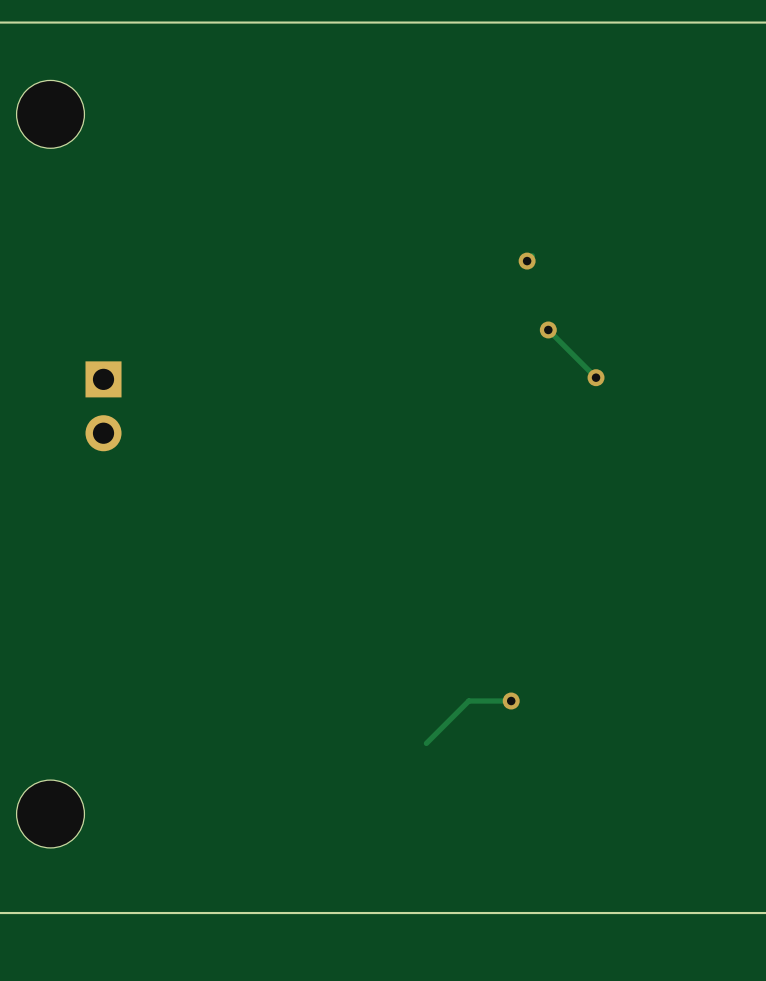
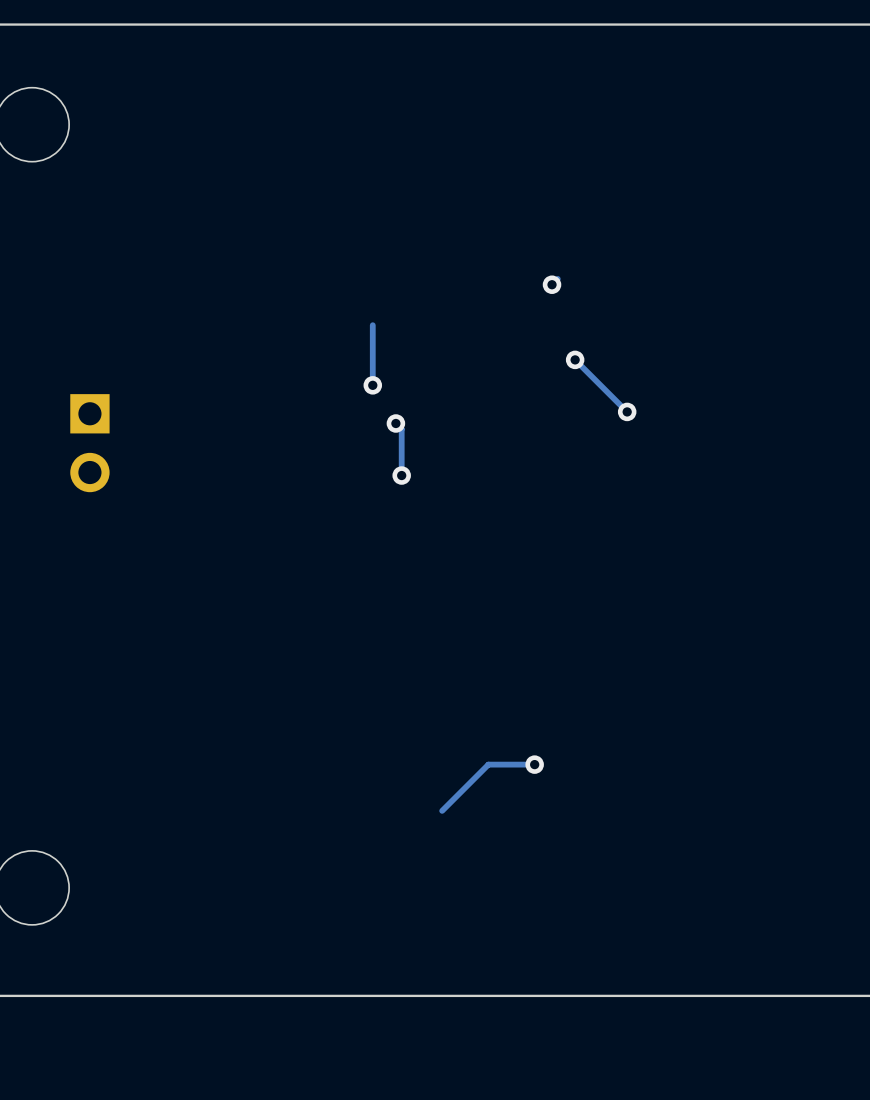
track: none -> (372, 325) (372, 385)
via: none -> (372, 385)
track: none -> (395, 423) (401, 429) (401, 475)
via: none -> (395, 423)
via: none -> (401, 475)

